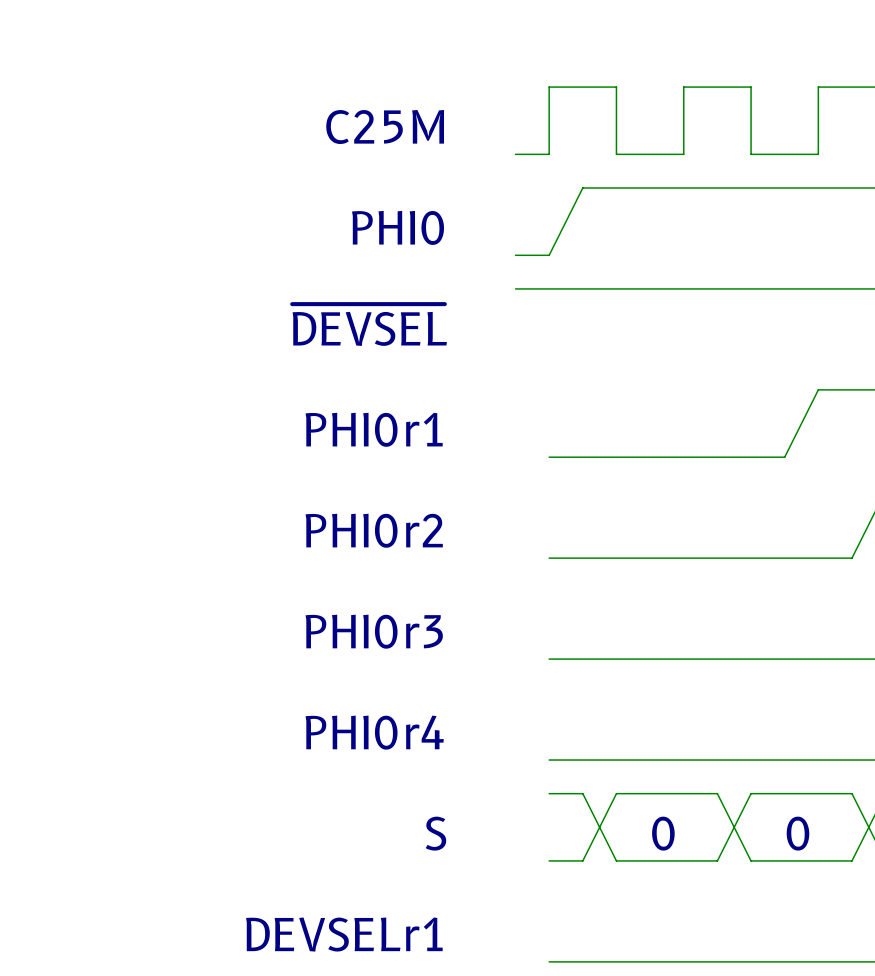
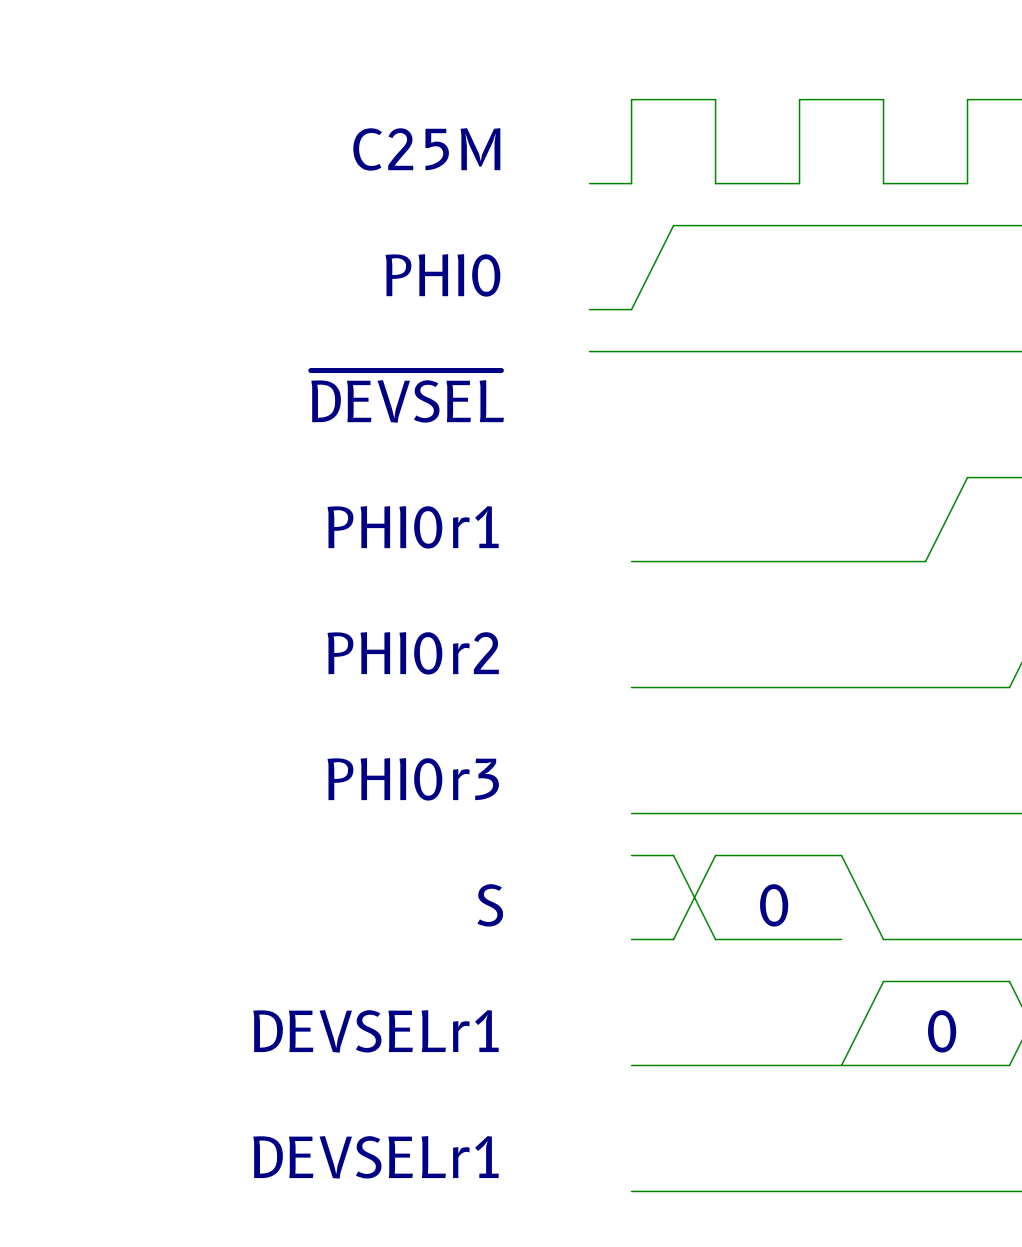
text: PHI0r4 (374, 732) -> S (490, 905)
wire: (582, 760) (616, 760) -> (631, 855) (673, 855) (715, 939)
wire: (717, 760) (751, 760) -> (673, 939) (715, 855) (841, 855) (883, 939)
wire: (549, 793) (582, 793) (616, 860) -> (673, 1065) (715, 1065)
text: S (435, 833) -> DEVSELr1 (376, 1031)
text position: 0 (663, 833) -> 0 (774, 905)
wire: (582, 860) (616, 793) (717, 793) (751, 860) -> (841, 1065) (883, 1065)

